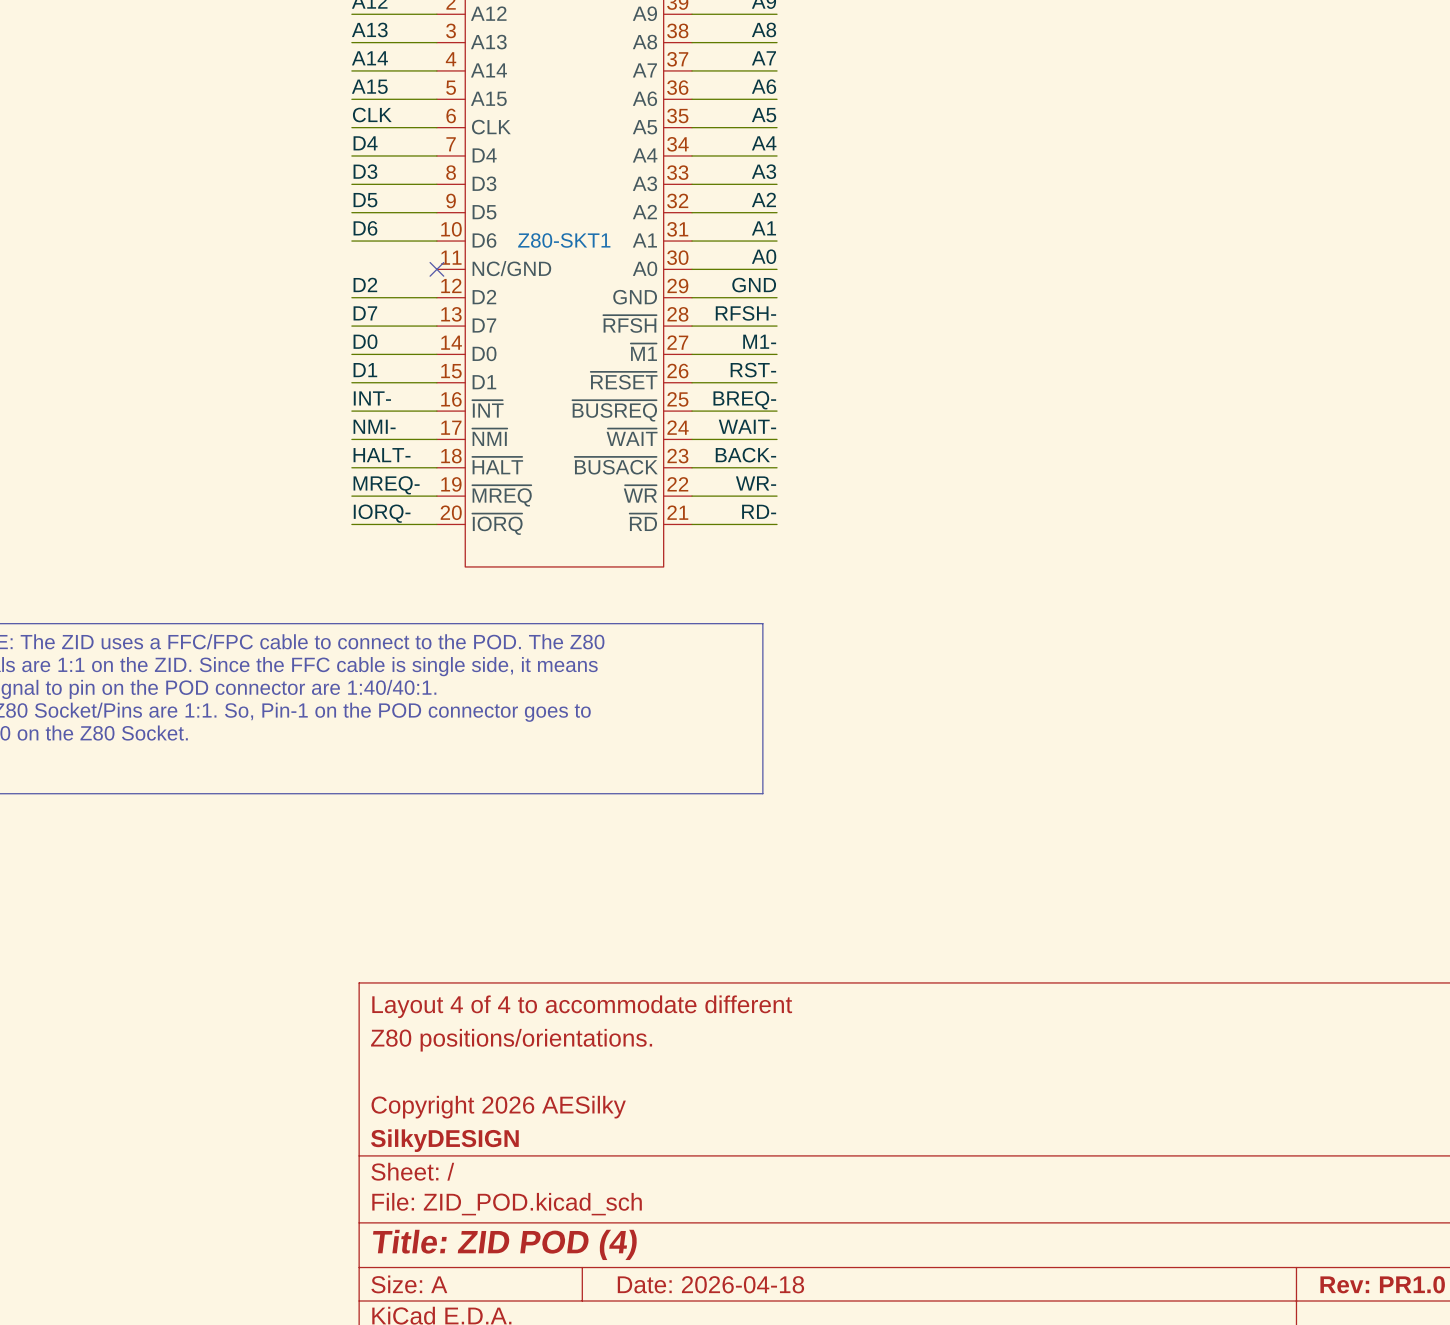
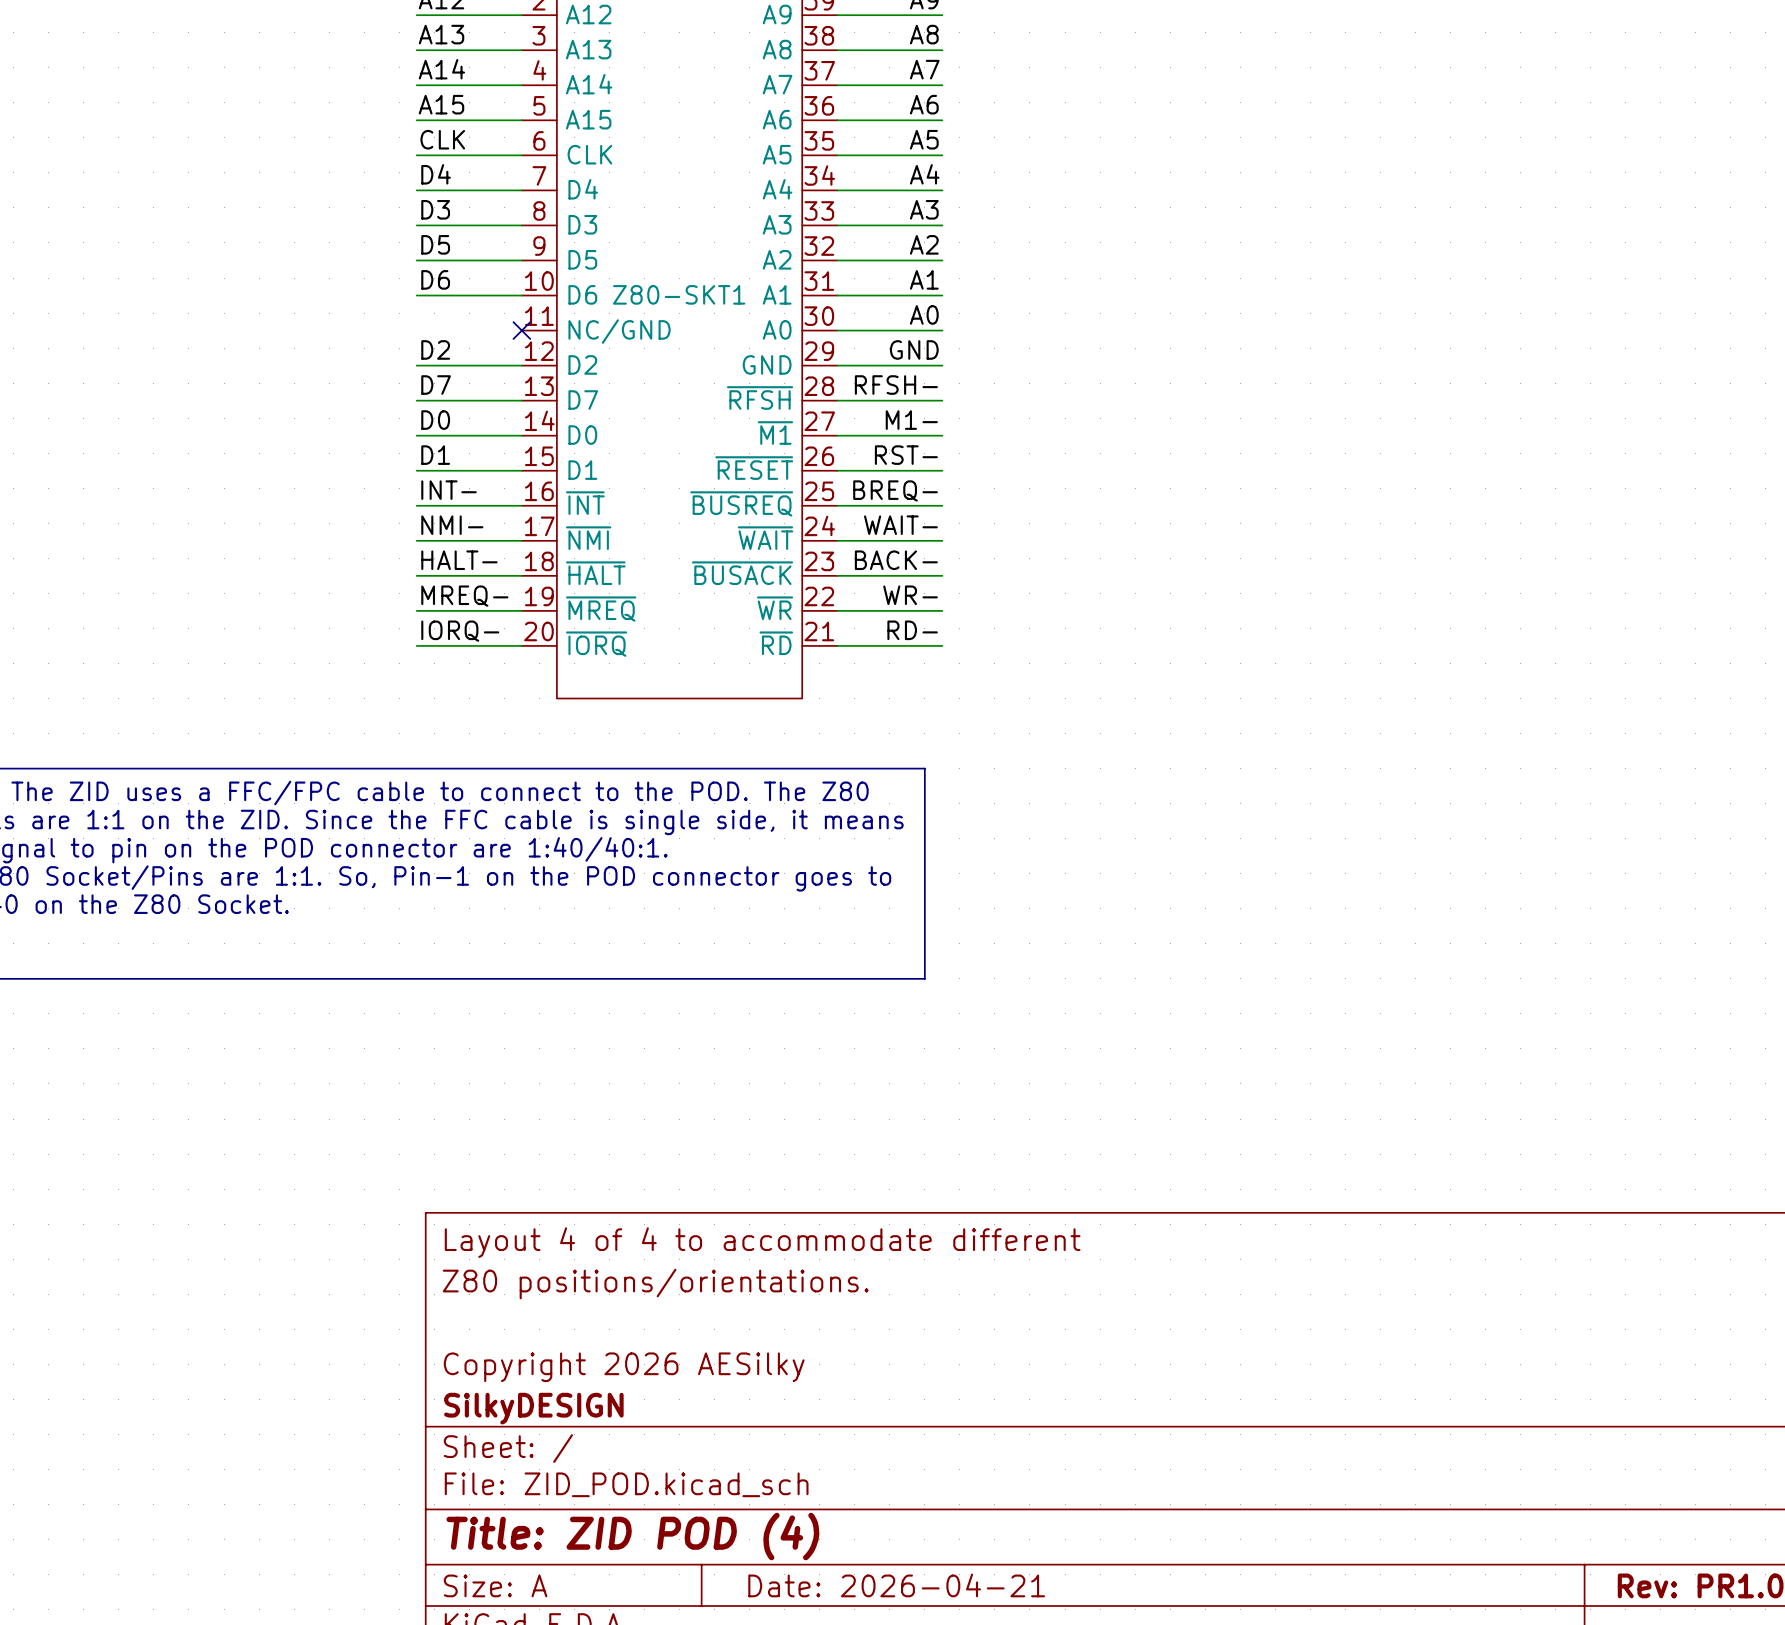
title block: Date: 2026-04-18 (710, 1284) -> Date: 2026-04-21 (896, 1585)

